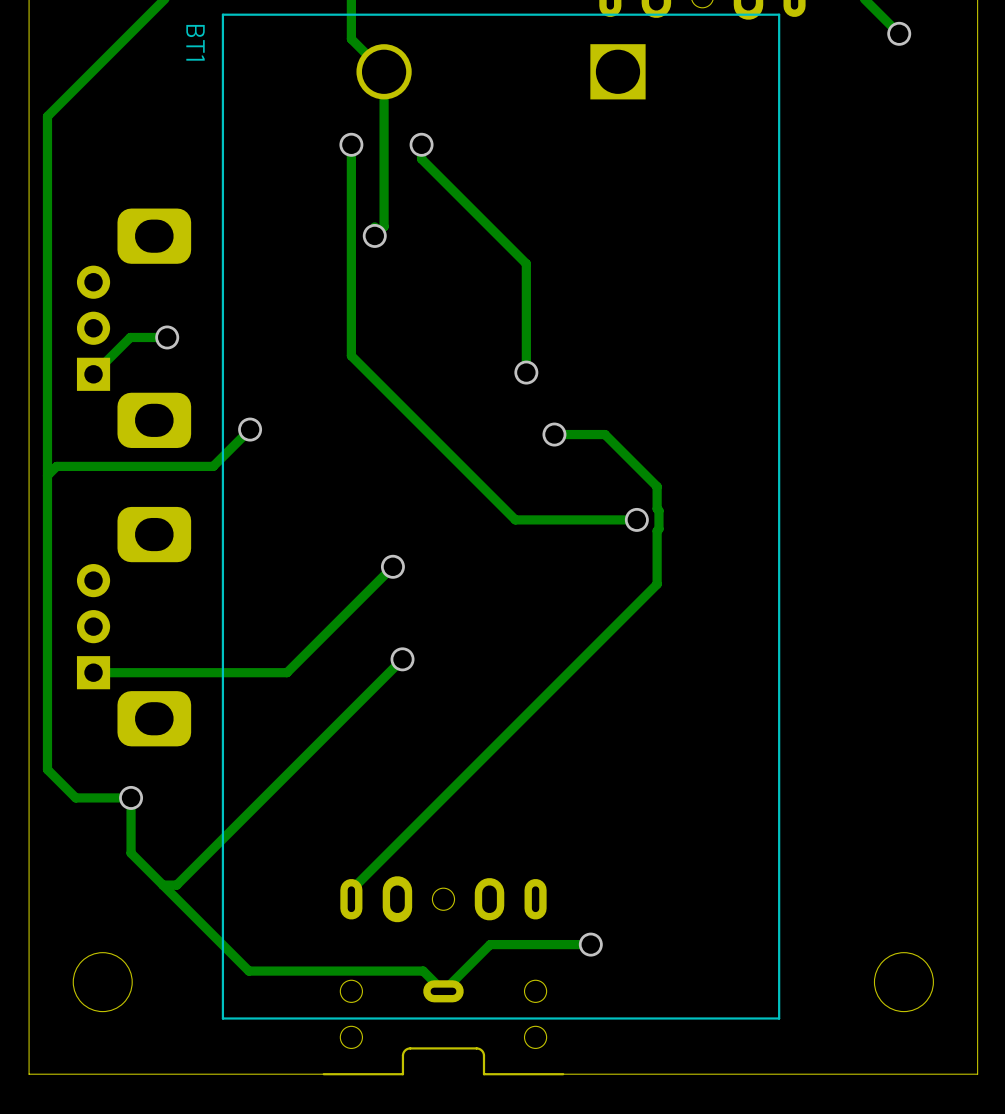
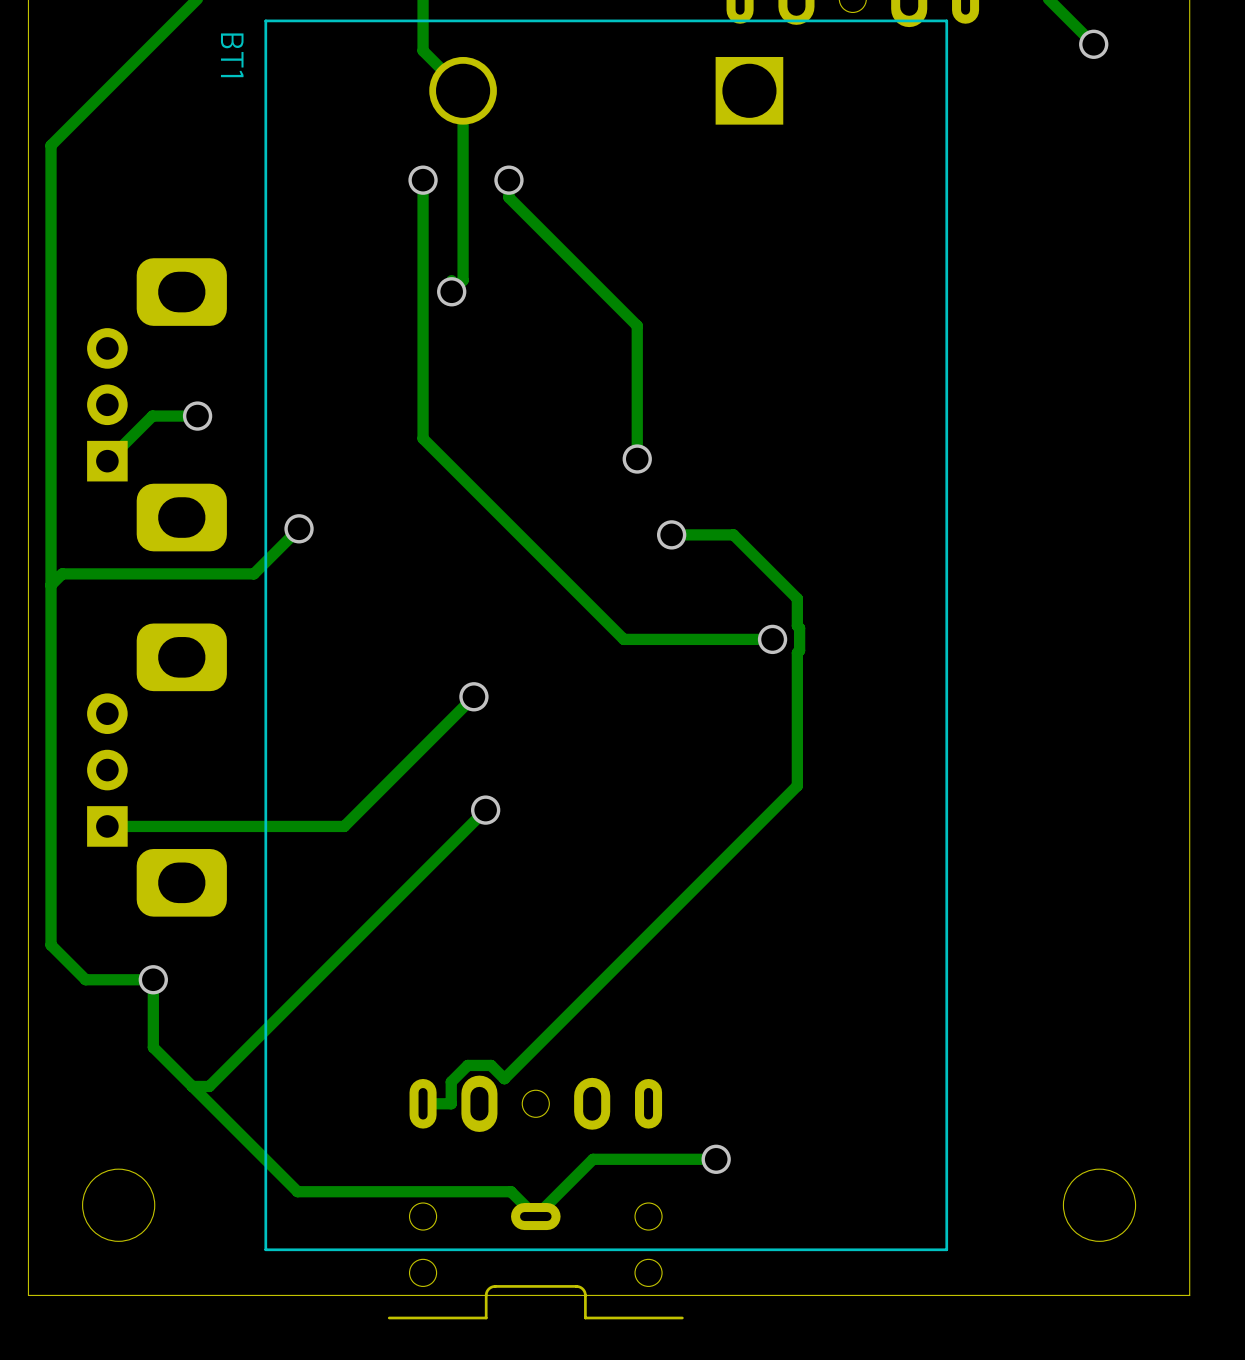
track: (657, 584) (351, 890) (351, 899) -> (797, 718) (797, 785) (504, 1078) (491, 1065) (467, 1065) (451, 1081) (451, 1103) (423, 1103)
board edge: (29, 1055) (29, 1074) (323, 1074) -> none
board edge: (977, 1055) (977, 1074) (563, 1074) -> (1189, 1295) (28, 1295)

